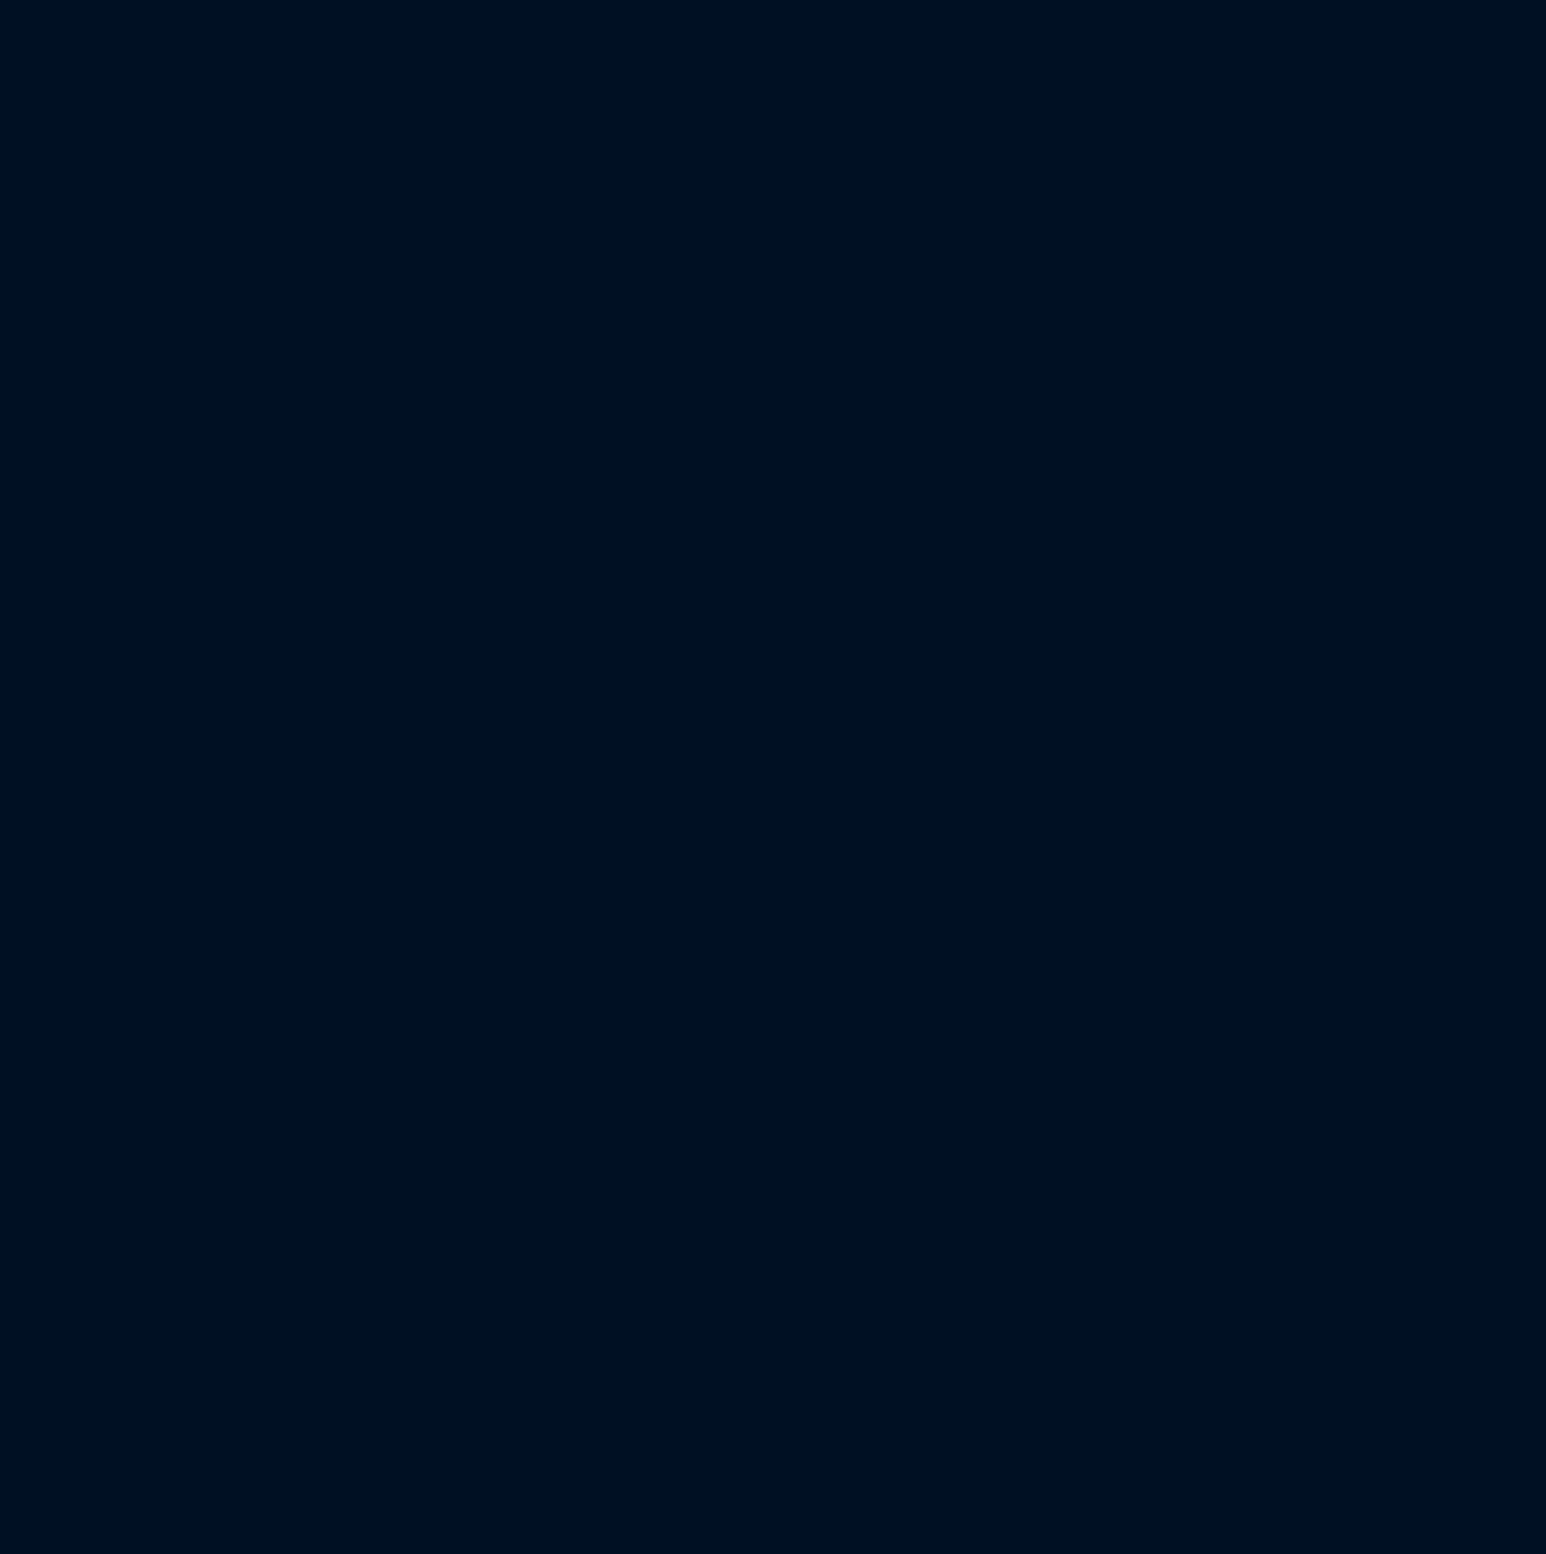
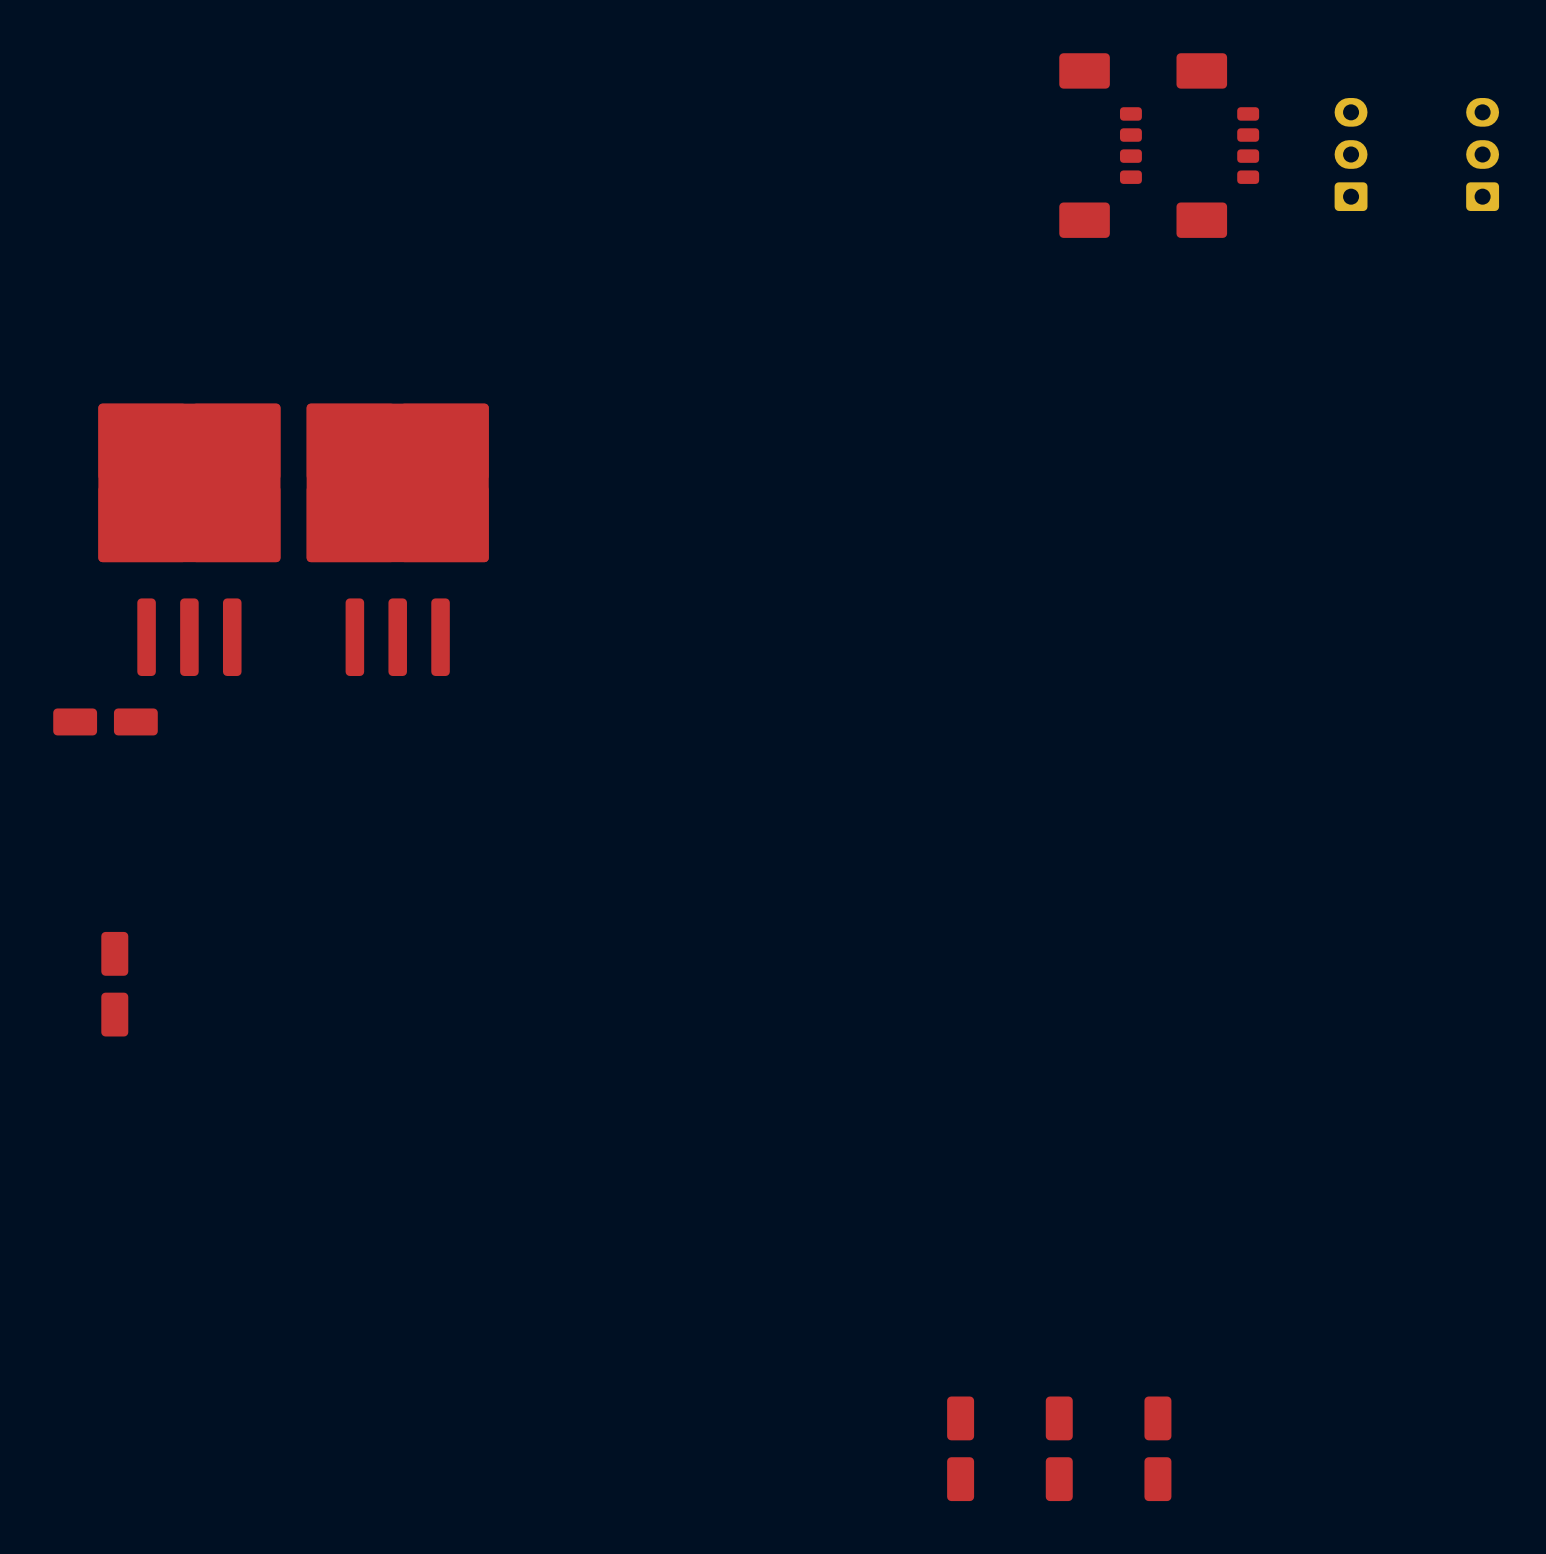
part: none -> (1100, 145)
part: none -> (1217, 145)
part: none -> (1351, 154)
part: none -> (1482, 154)
part: none -> (189, 539)
part: none -> (397, 539)
part: none -> (105, 721)
part: none -> (114, 984)
part: none -> (960, 1448)
part: none -> (1059, 1448)
part: none -> (1157, 1448)

